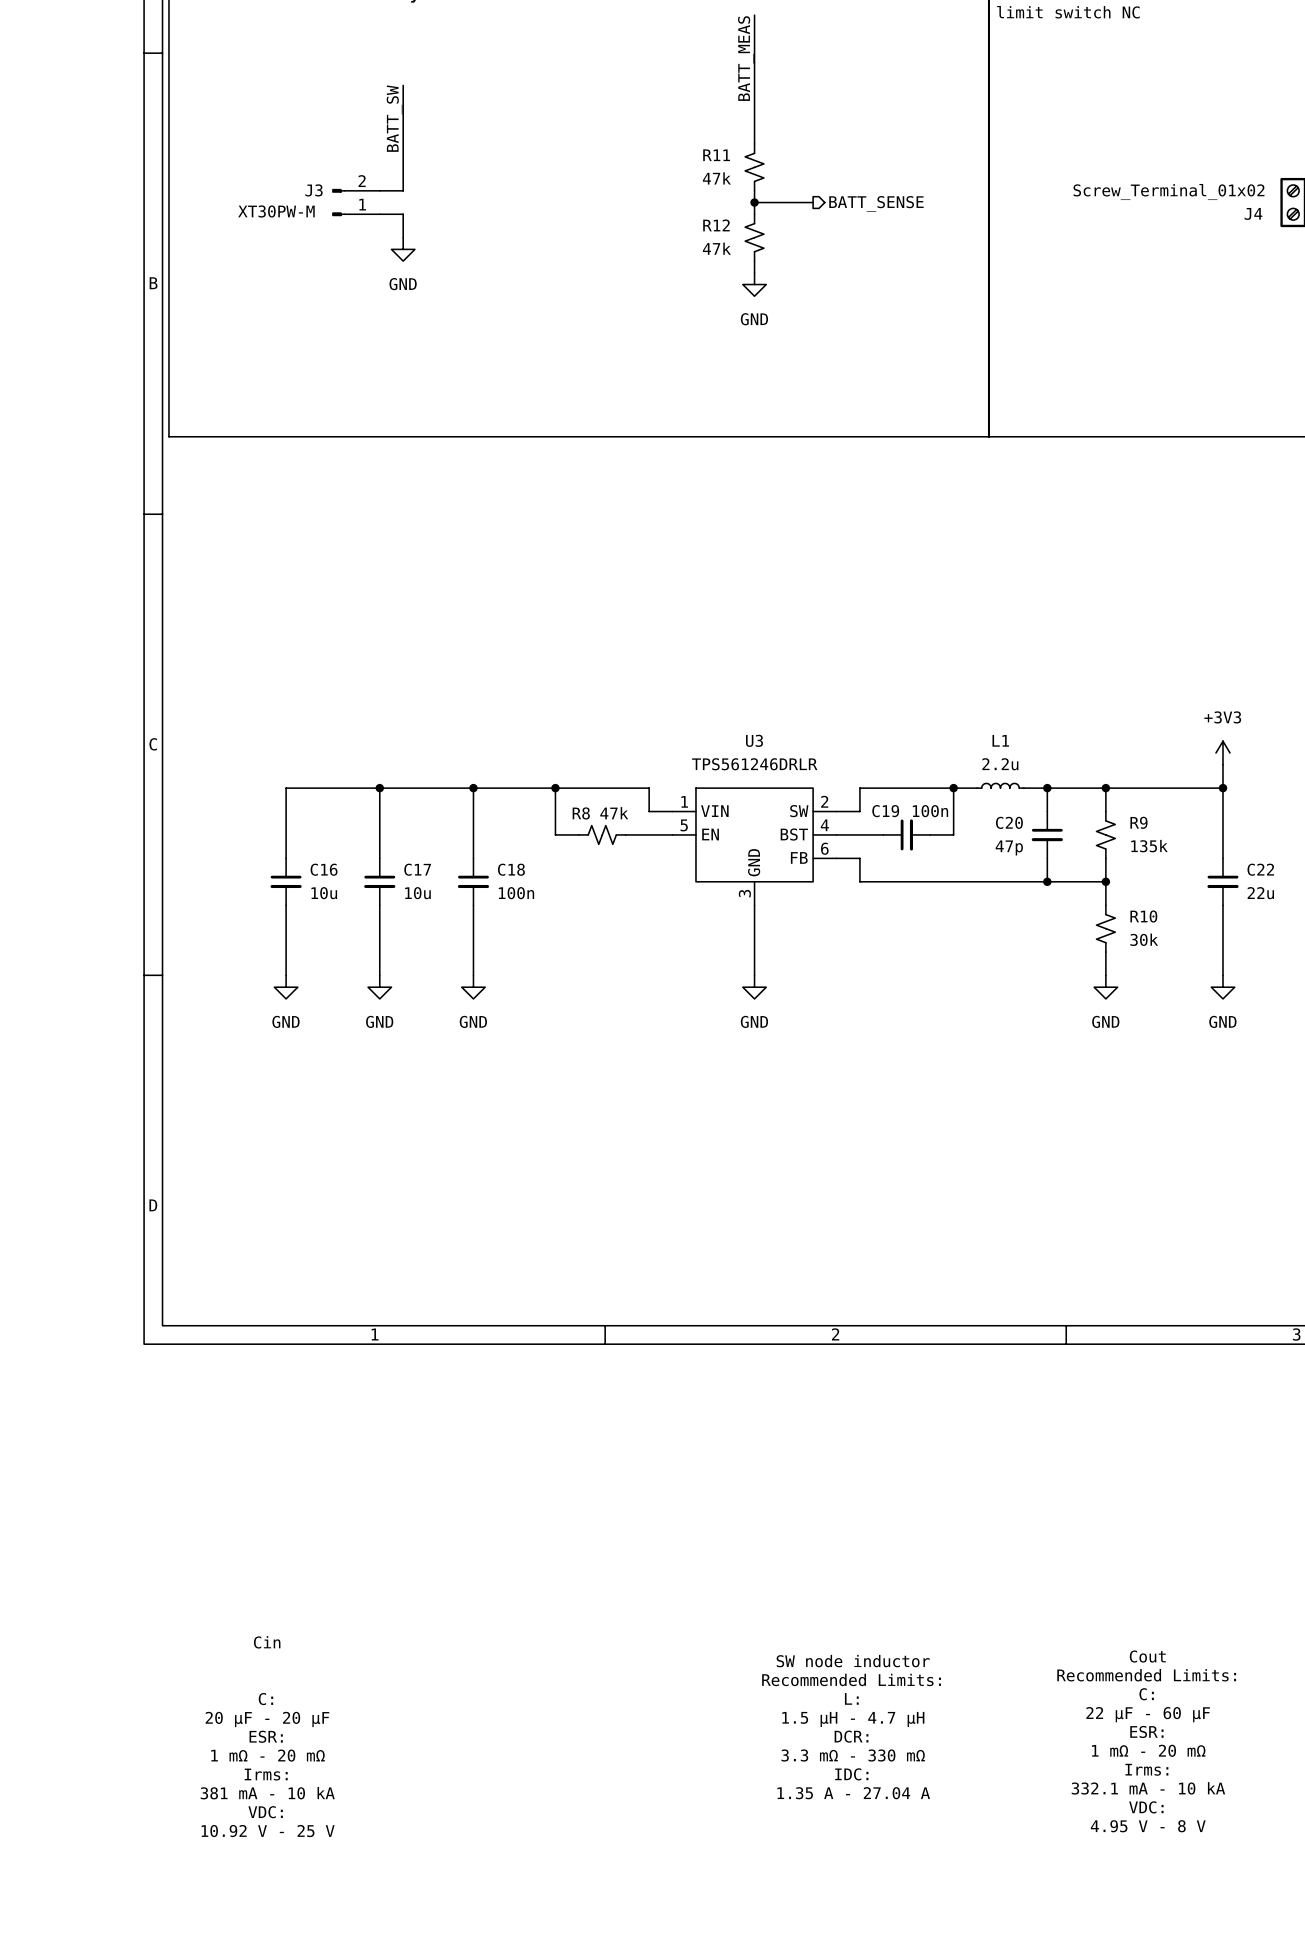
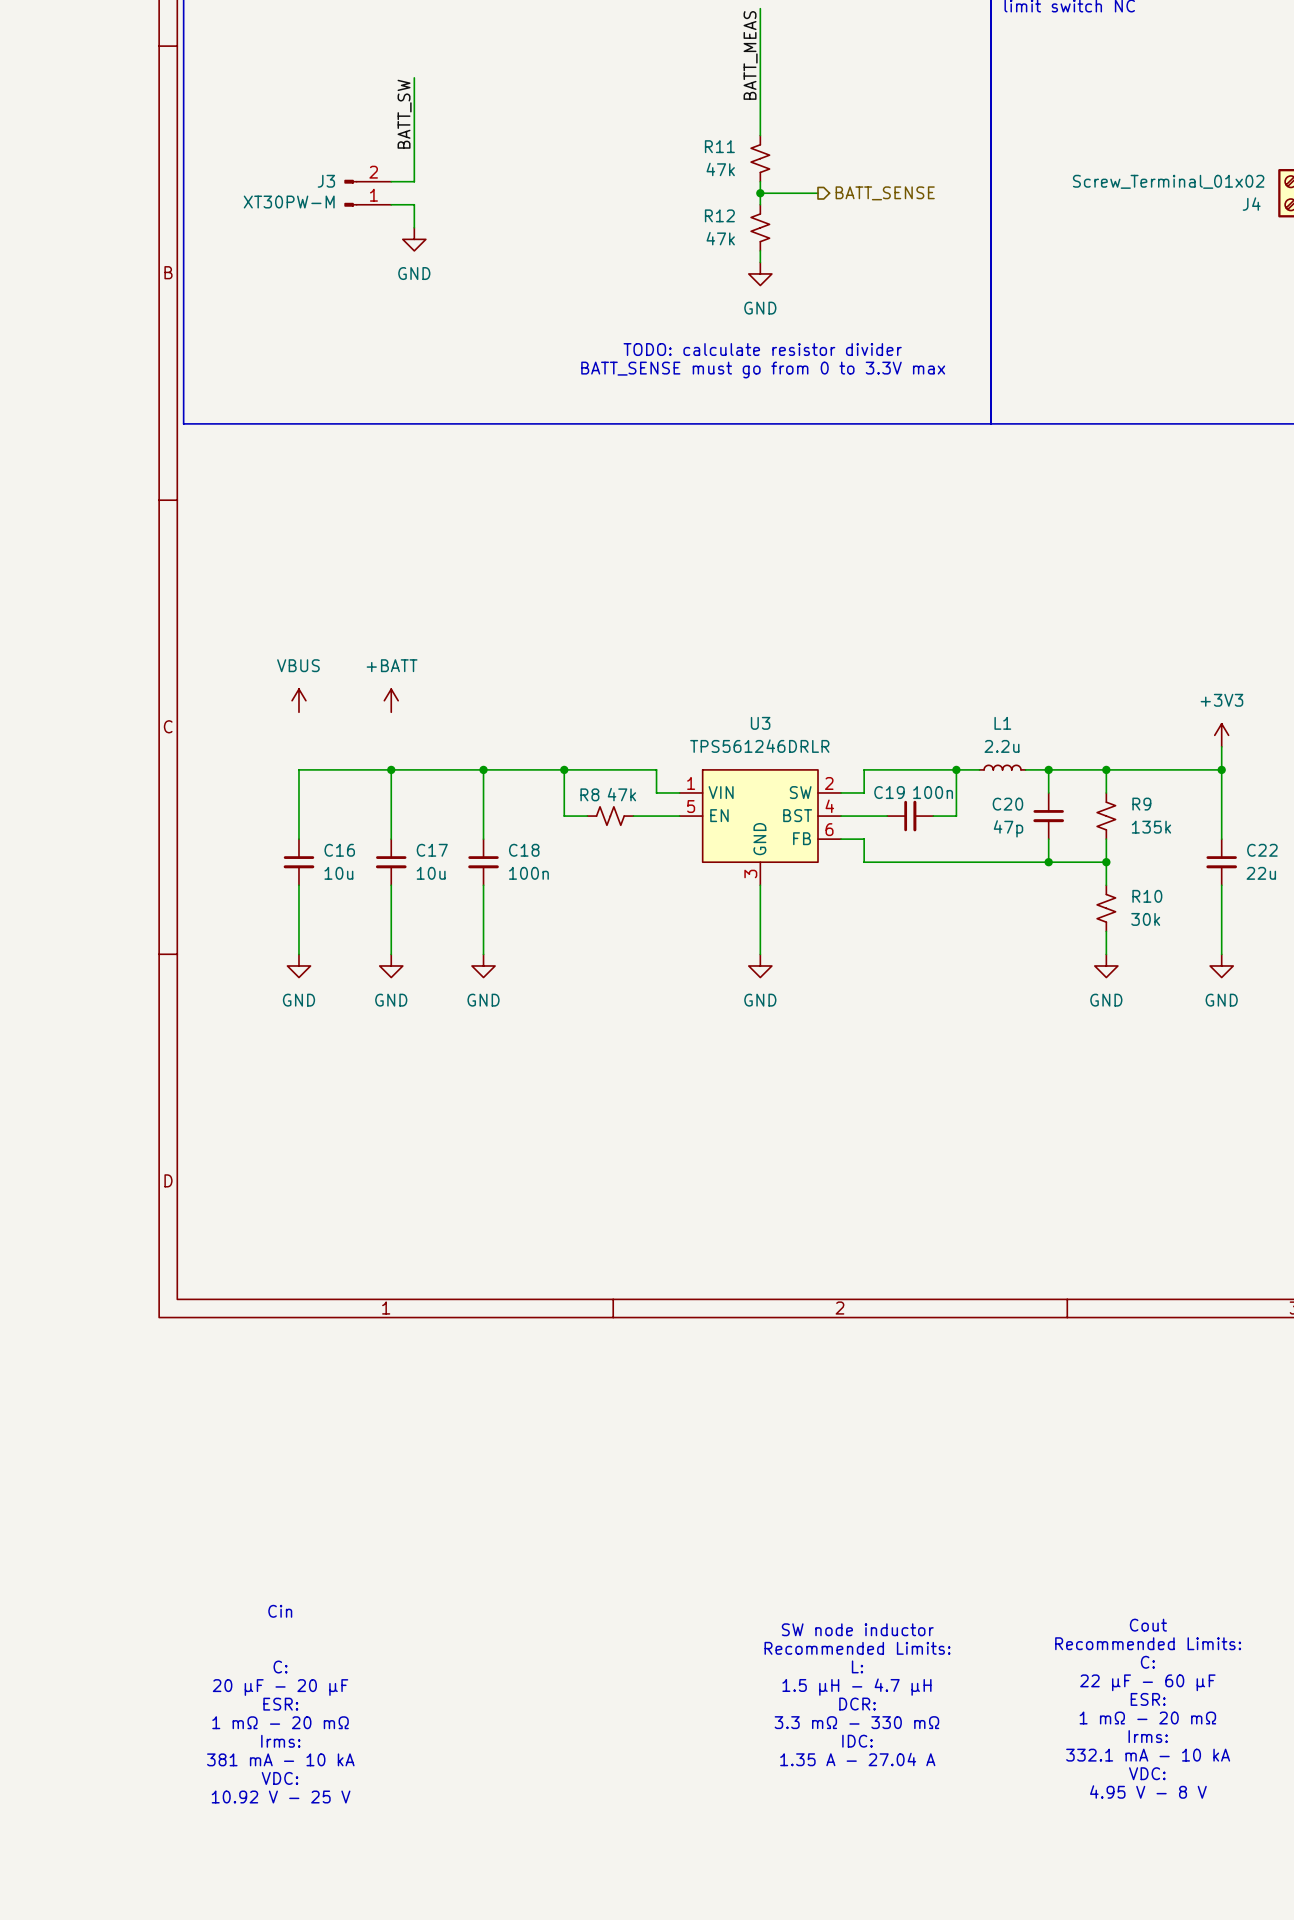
text: none -> TODO: calculate resistor divider (762, 349)
text: none -> BATT_SENSE must go from 0 to 3.3V max (763, 370)
power symbol: none -> VBUS (298, 700)
power symbol: none -> +BATT (391, 700)

